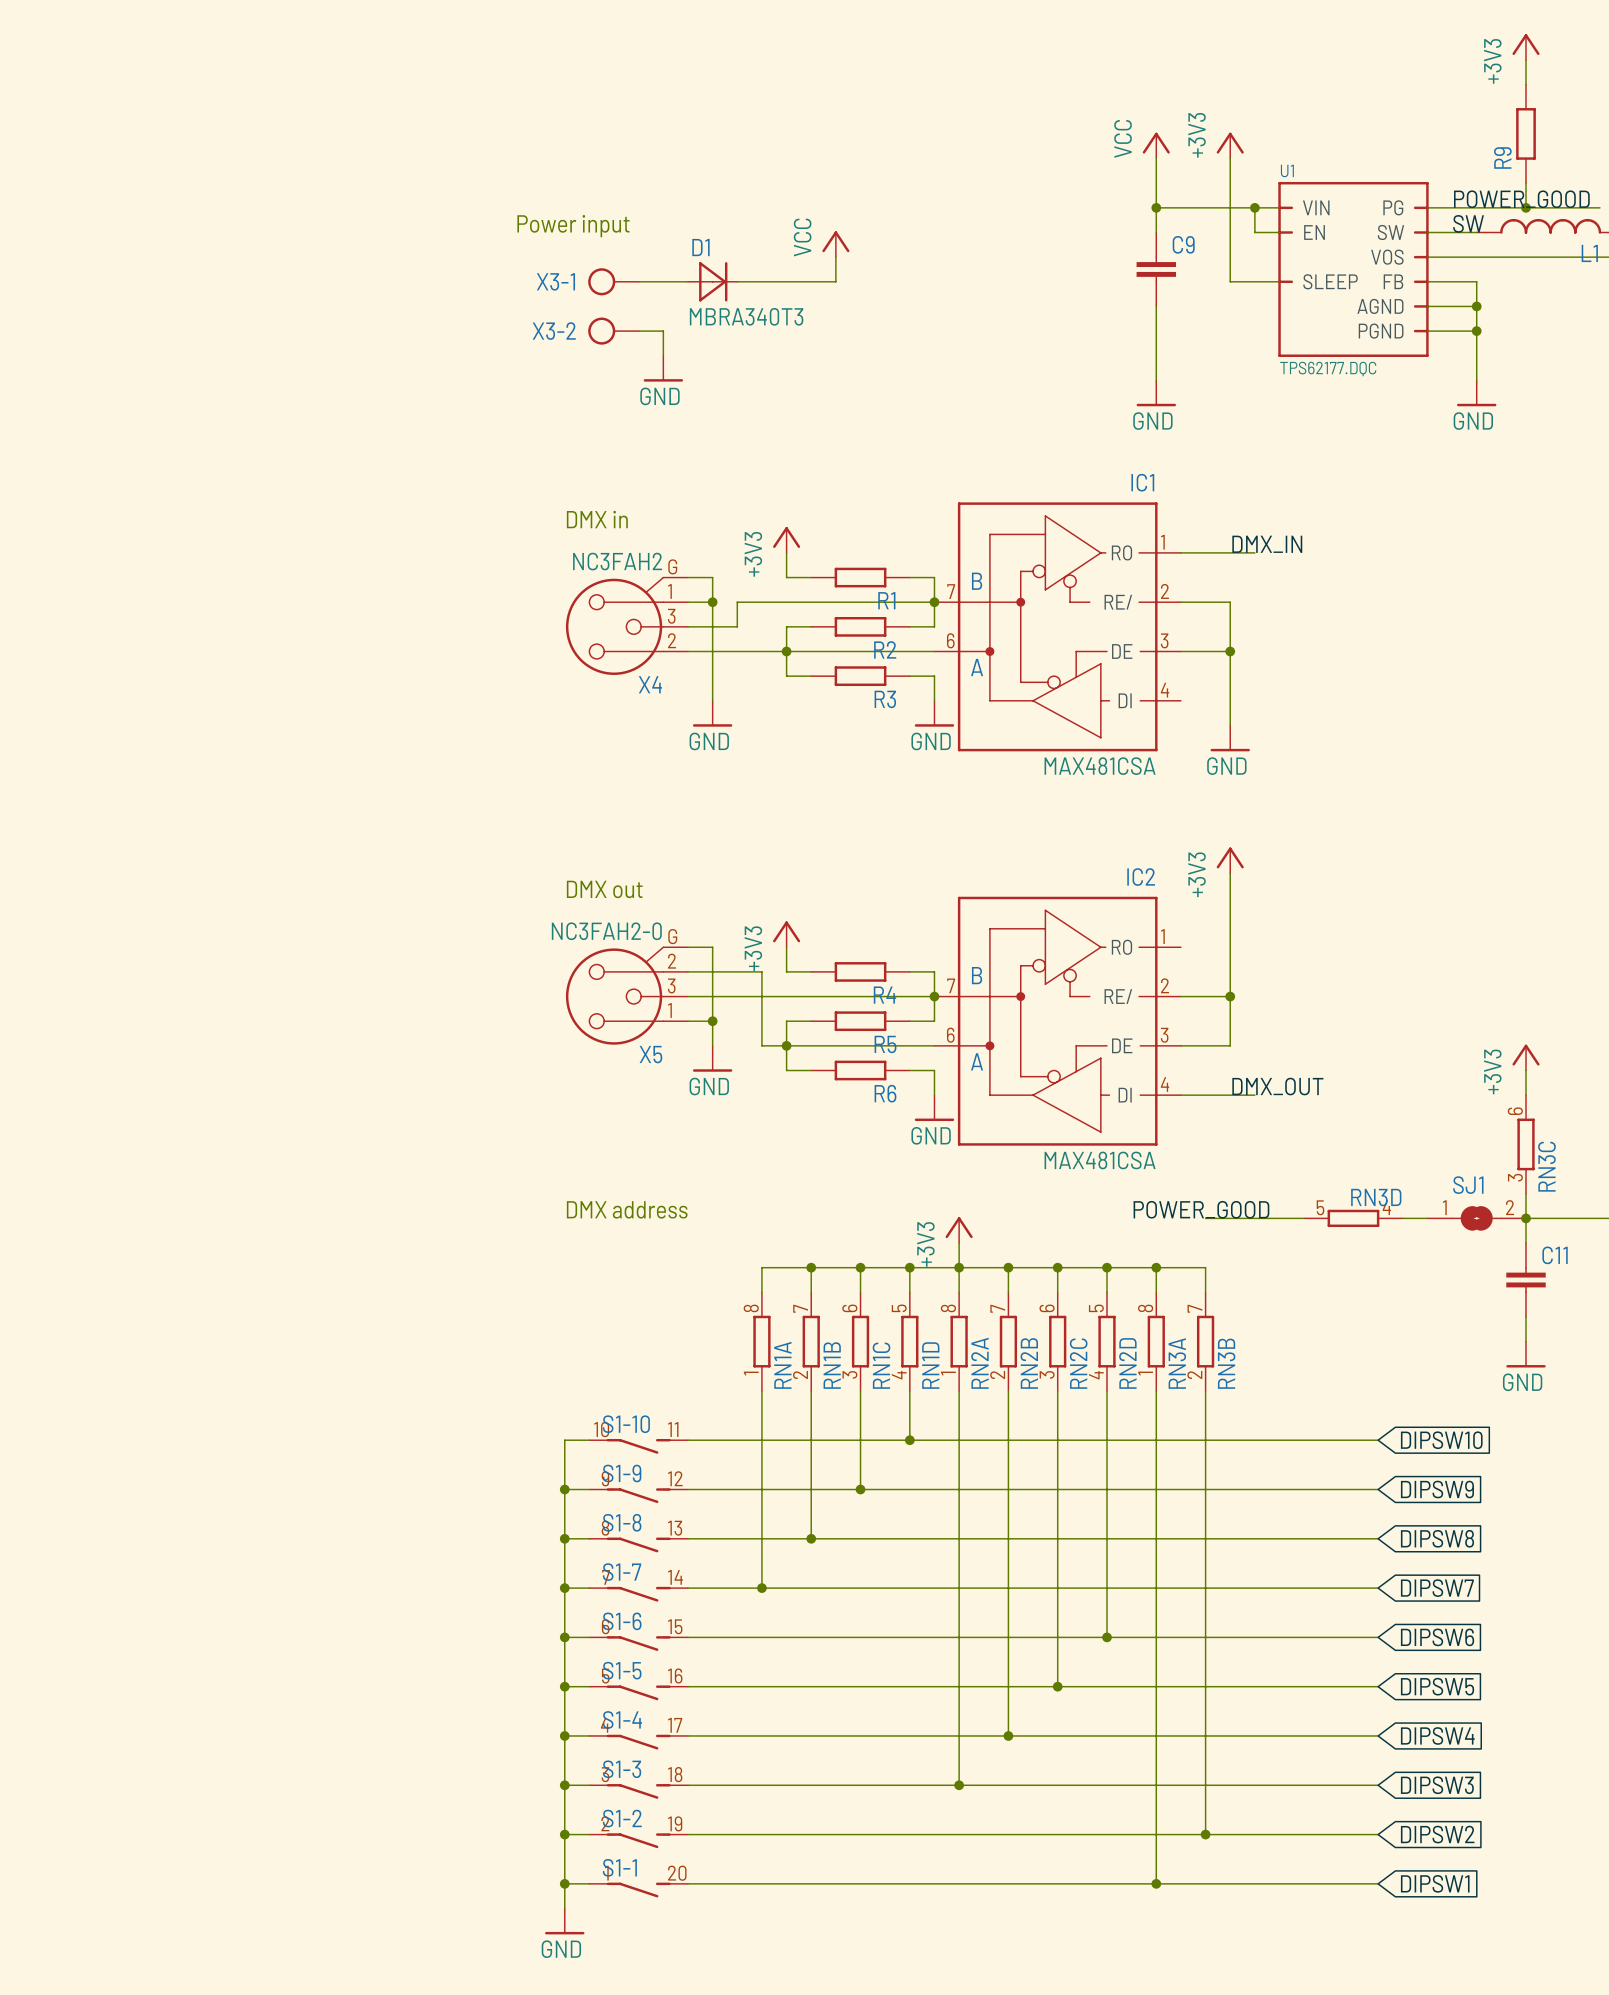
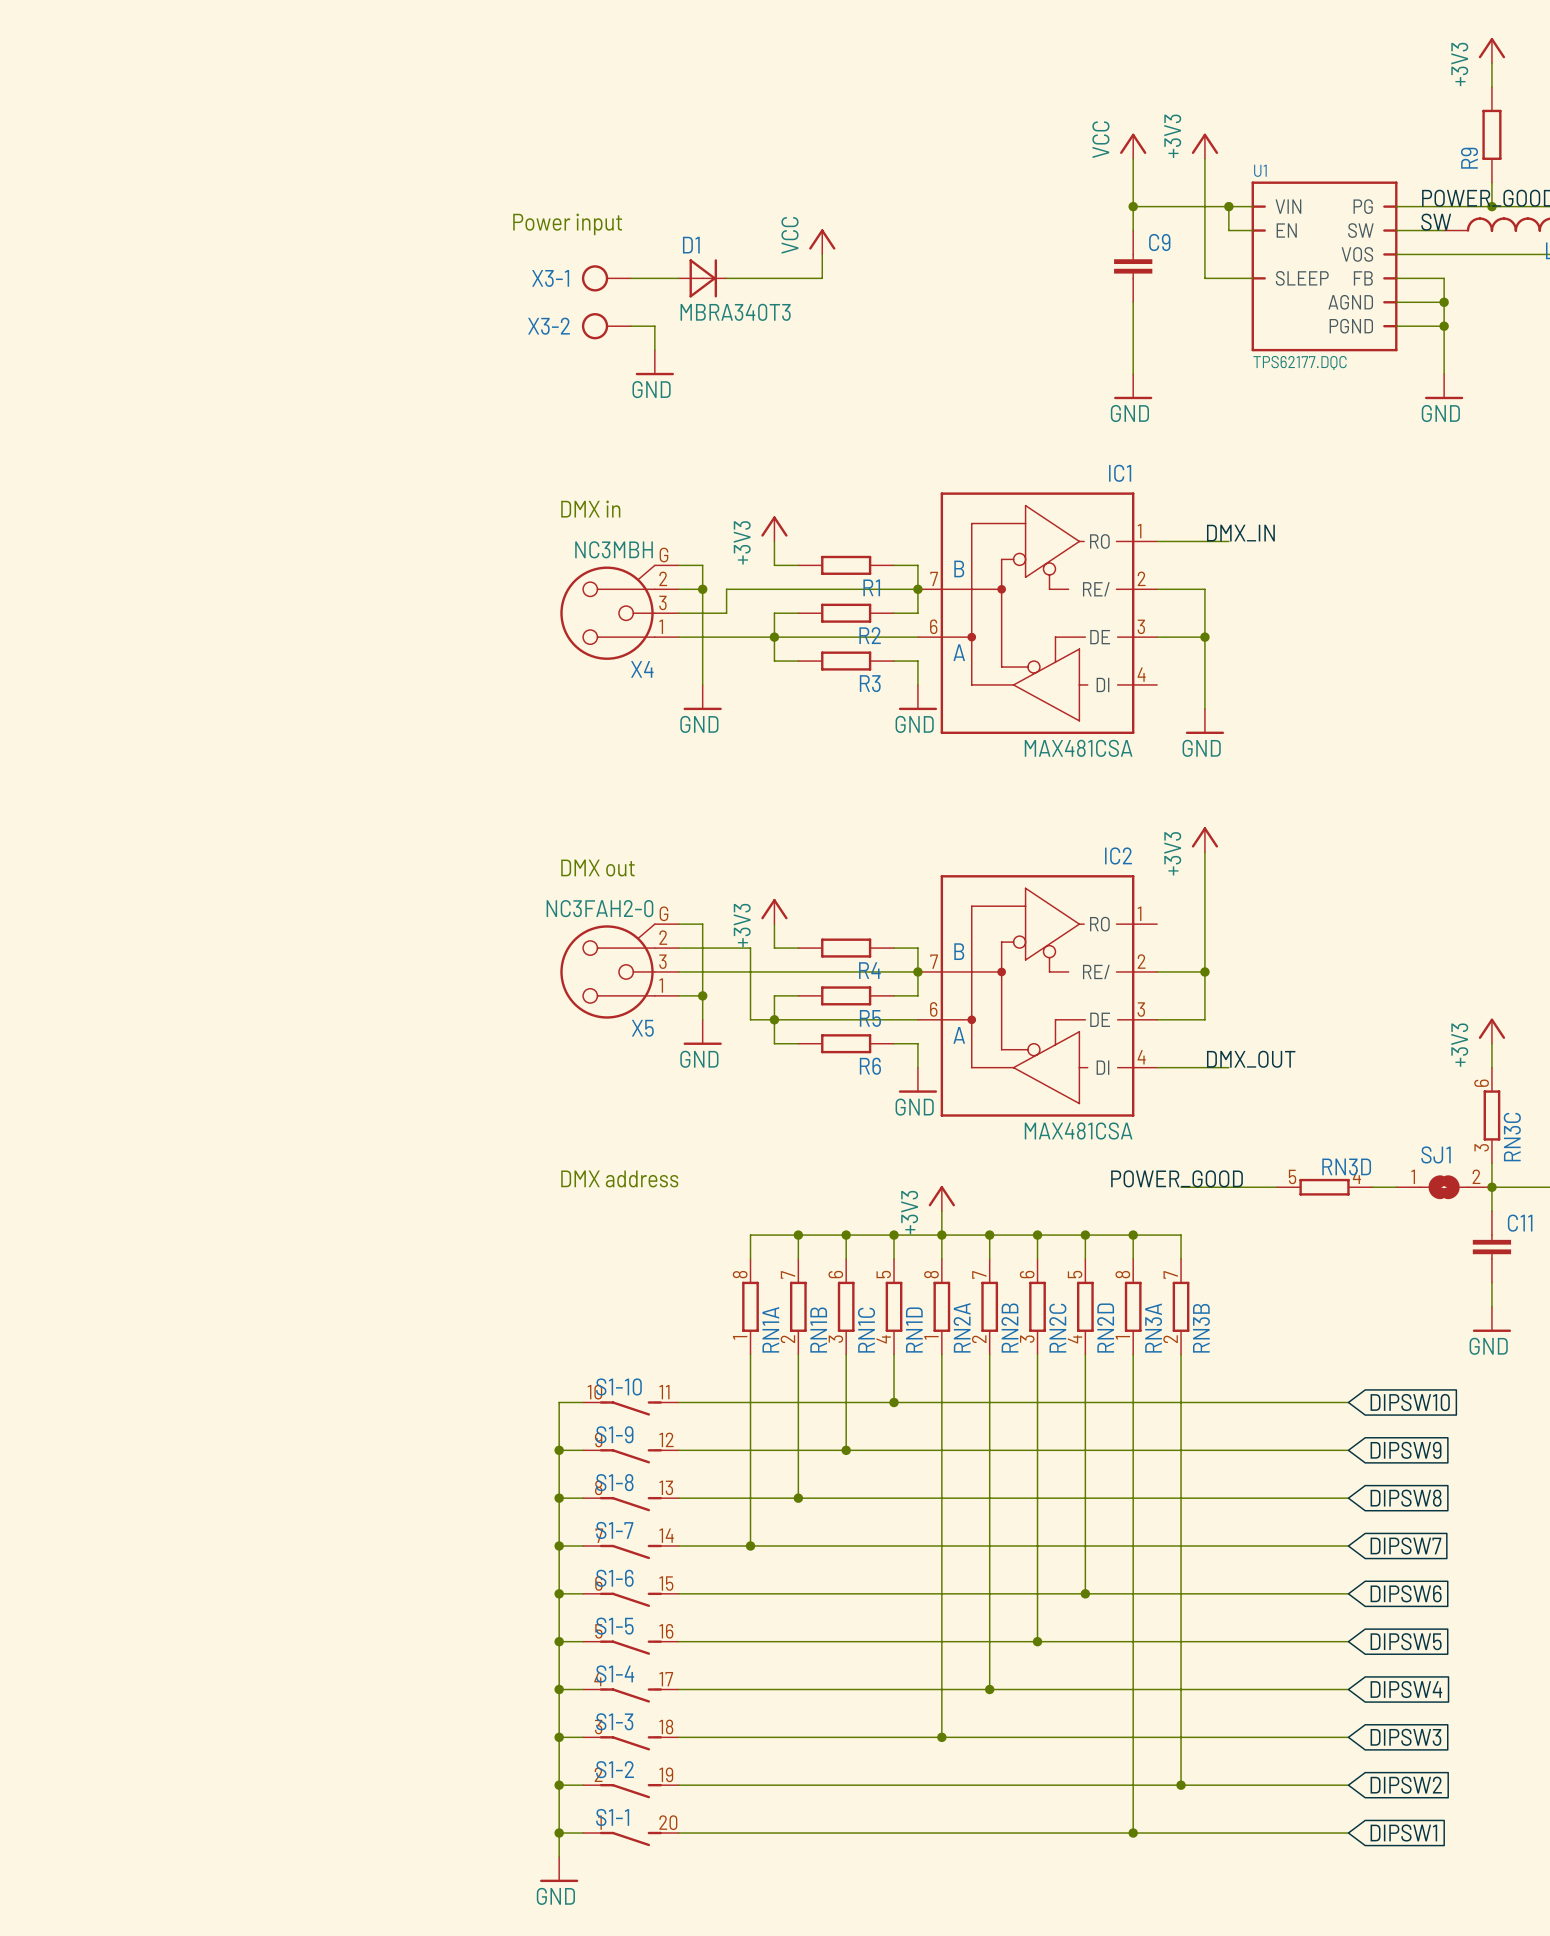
X4 value: NC3FAH2 (617, 561) -> NC3MBH (614, 549)
X4 pin number: 1 (669, 591) -> 2 (663, 578)
X4 pin number: 2 (672, 640) -> 1 (661, 626)

